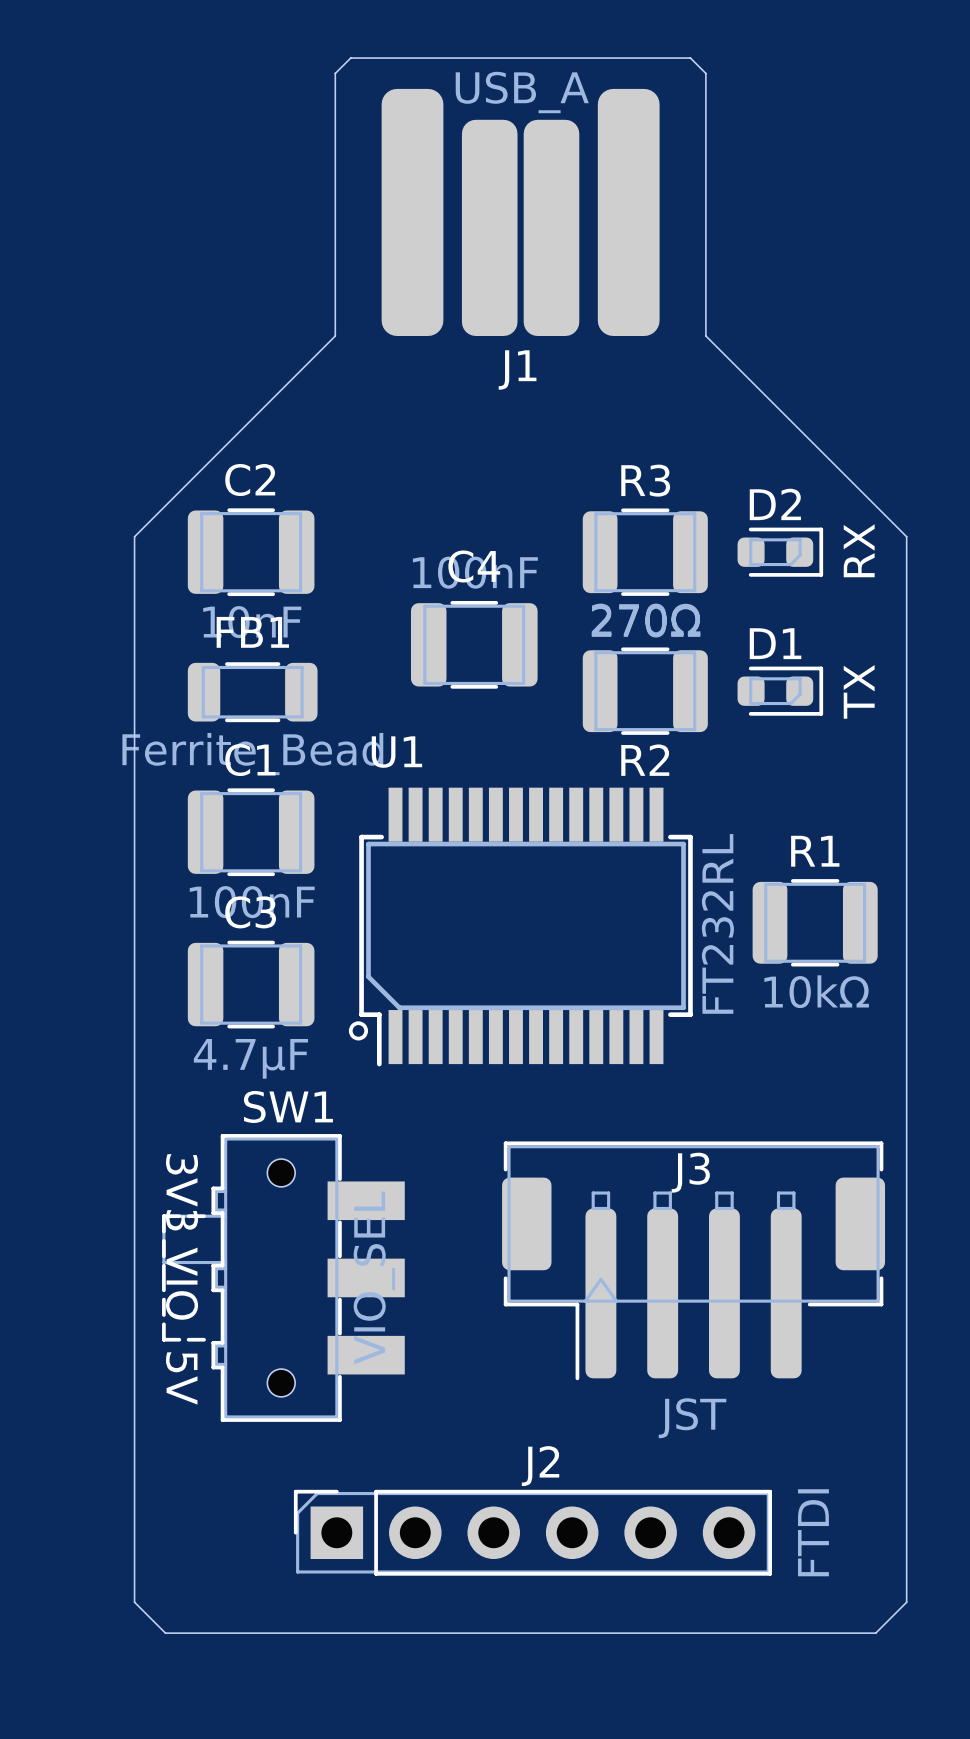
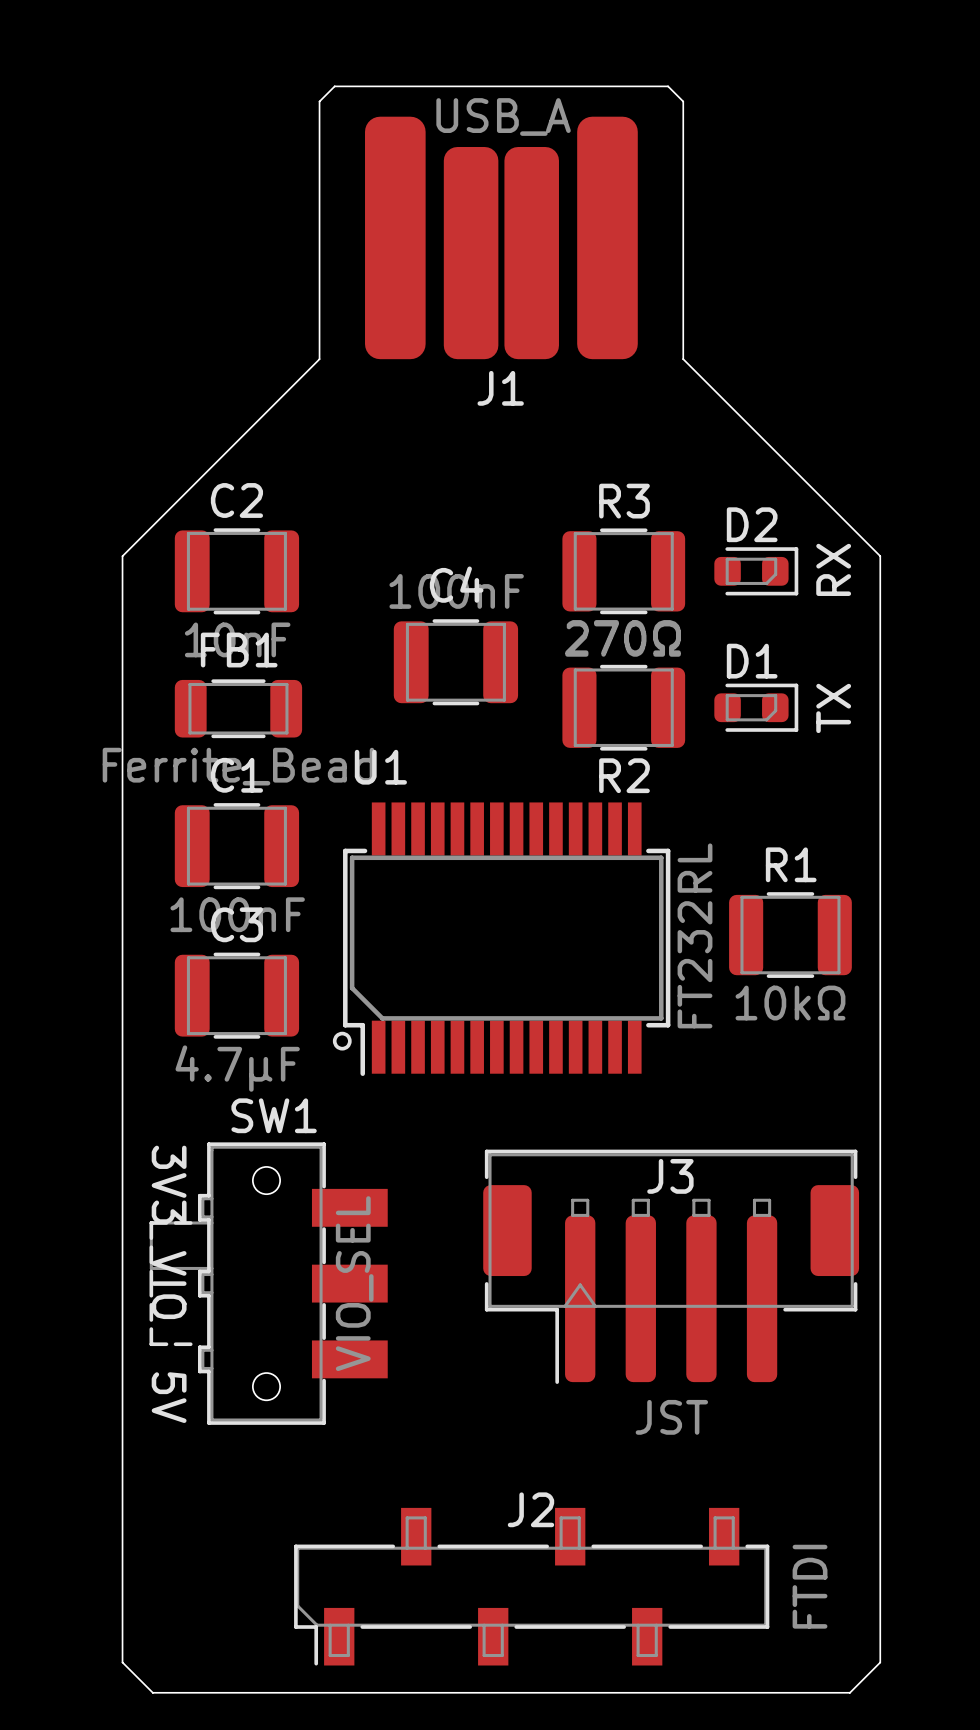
J2 footprint: [293, 1489, 773, 1576] -> [294, 1507, 770, 1666]
board edge: (134, 1602) (165, 1633) (875, 1633) (906, 1602) -> (122, 1601) (122, 1662) (152, 1692) (849, 1692) (880, 1662) (880, 1601)

